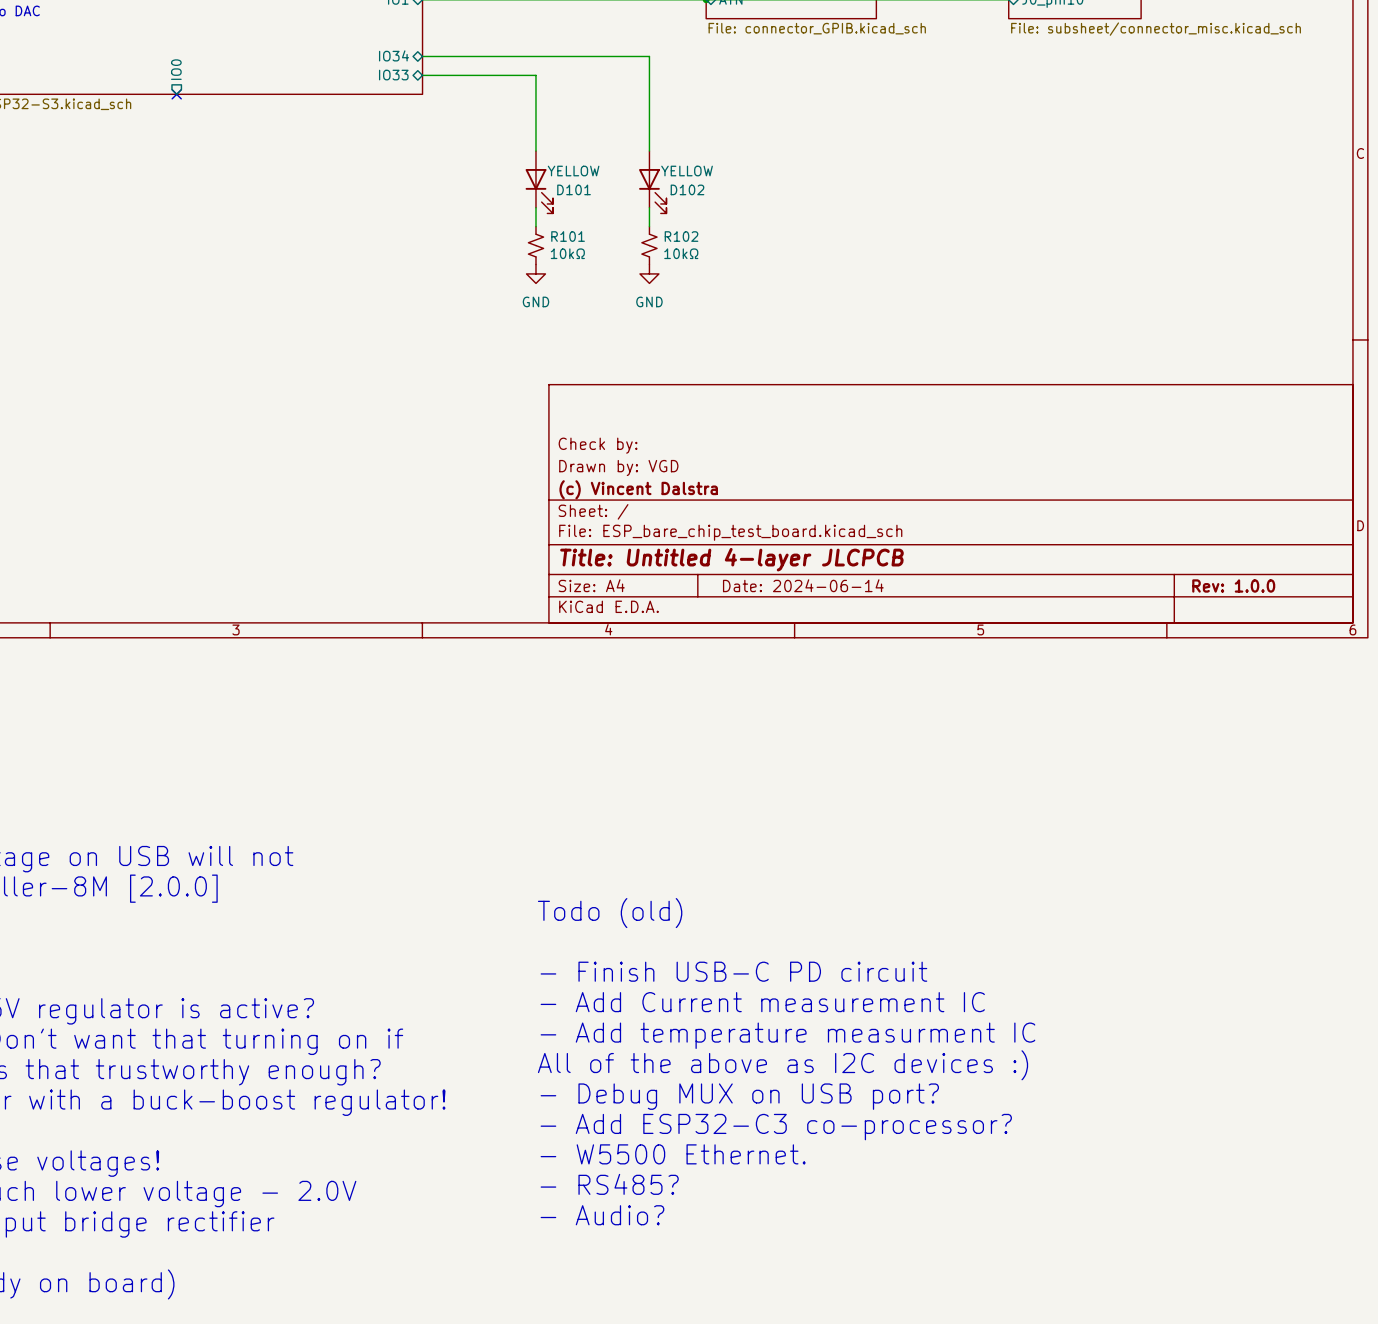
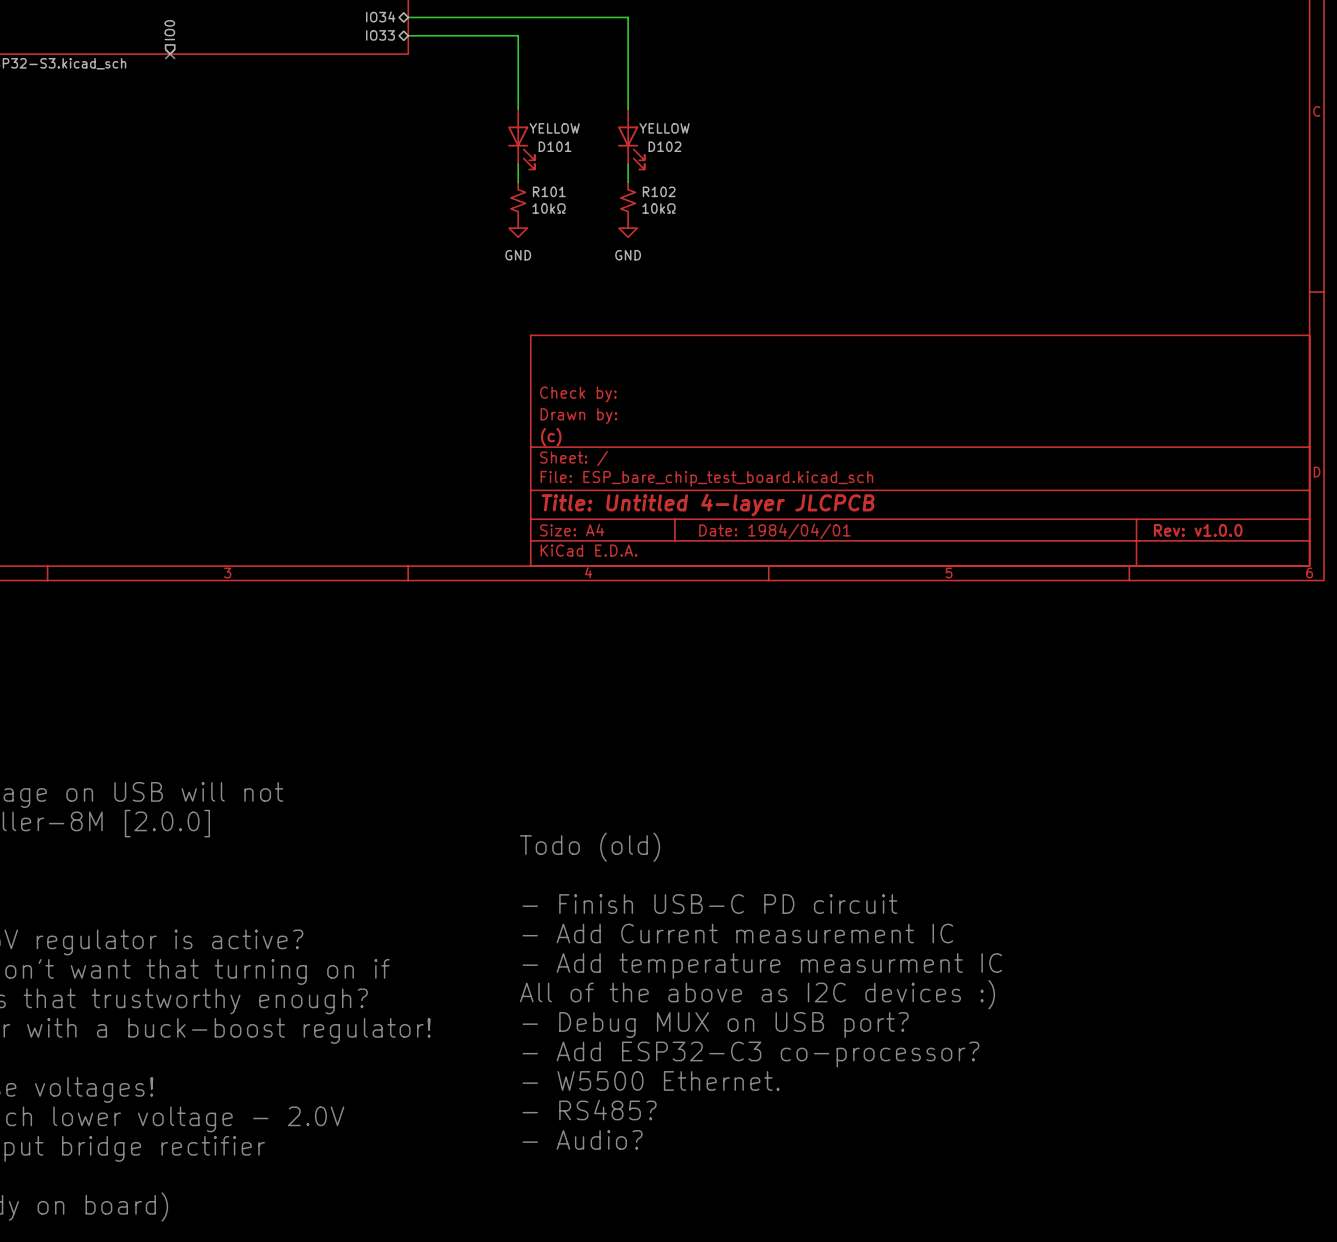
title block: Drawn by: VGD (618, 467) -> Drawn by: (578, 416)
title block: (c) Vincent Dalstra (638, 489) -> (c) (551, 437)
title block: Date: 2024-06-14 (803, 585) -> Date: 1984/04/01 (774, 531)
title block: Rev: 1.0.0 (1233, 585) -> Rev: v1.0.0 (1198, 530)

